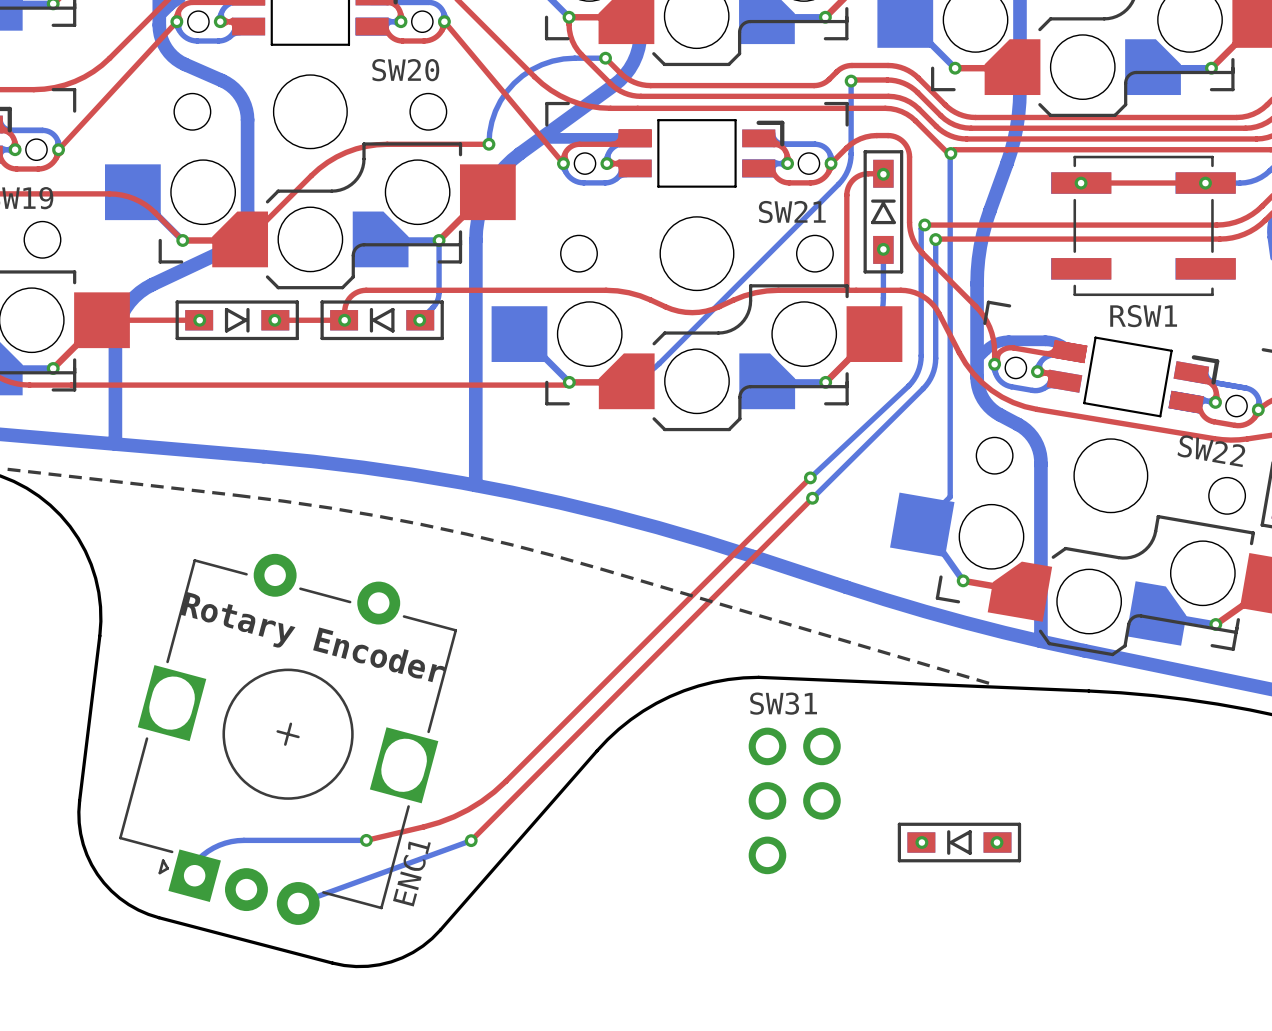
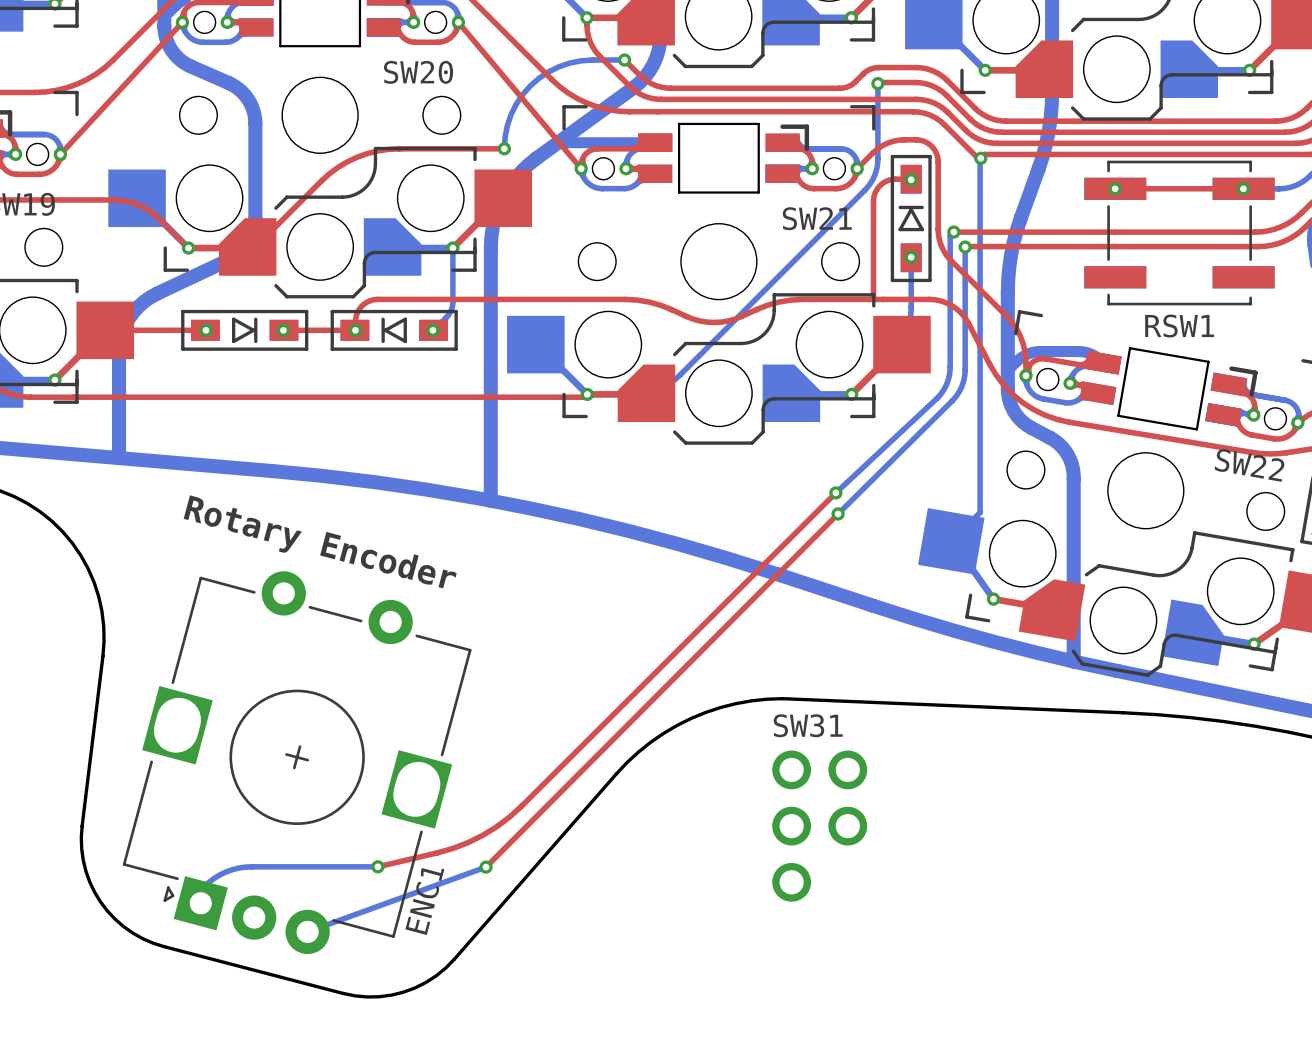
line: (7, 469) (283, 501) (375, 515) (466, 534) (601, 569) (994, 684) -> none
text position: Rotary Encoder (313, 637) -> Rotary Encoder (320, 541)
part: (959, 842) -> none

